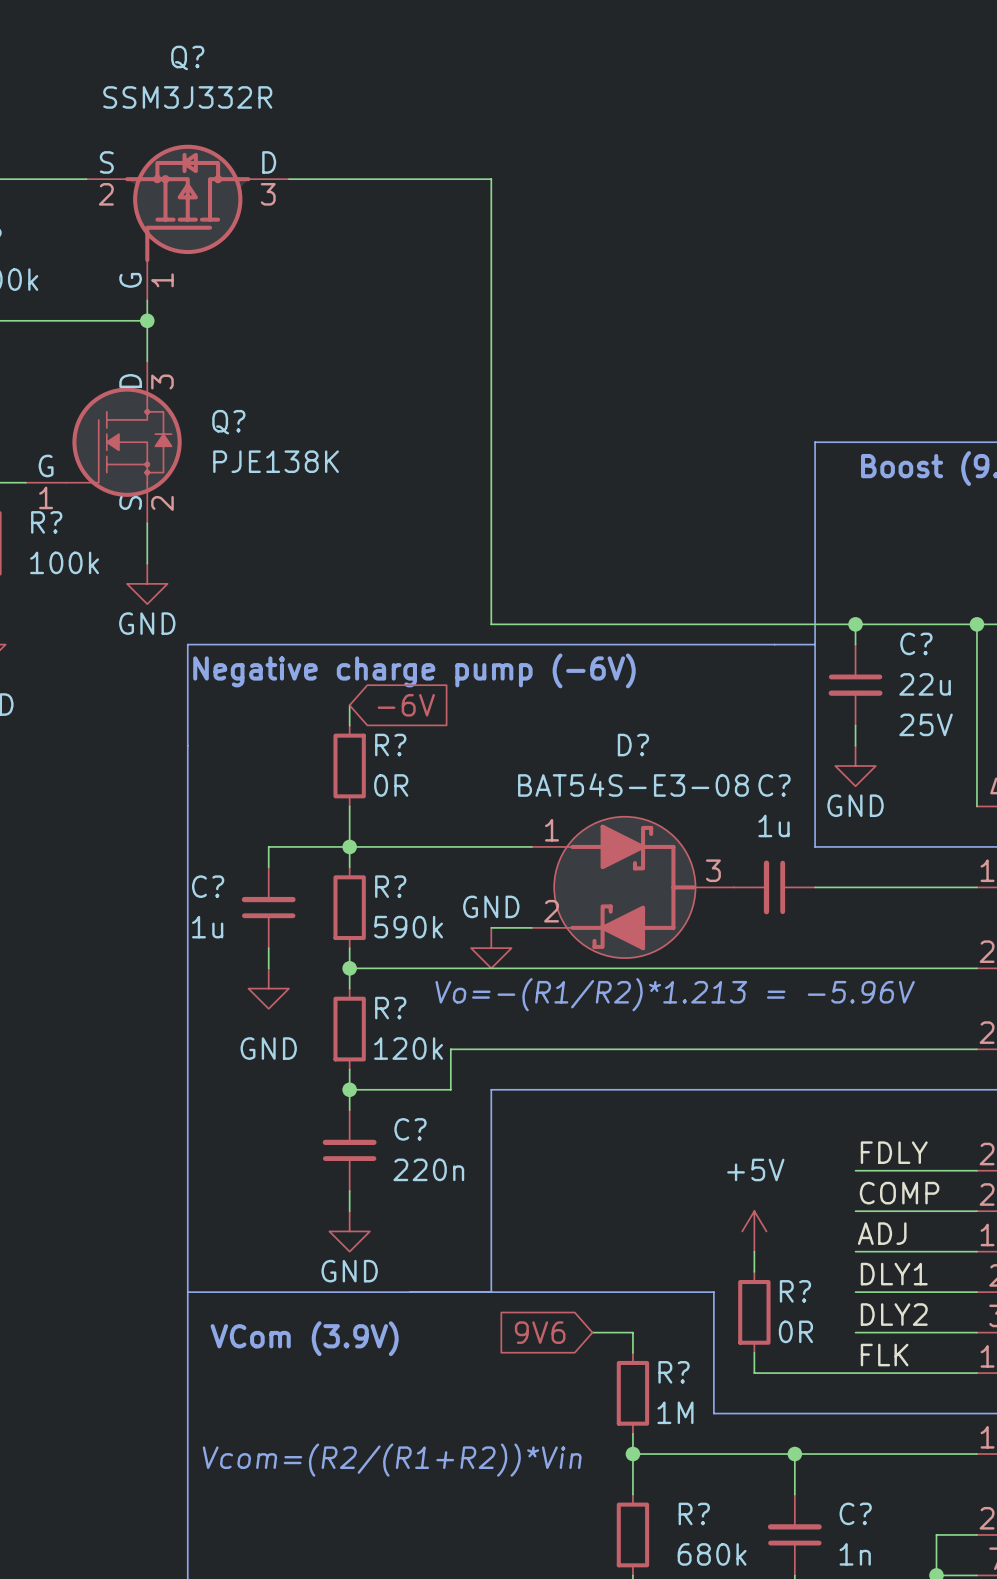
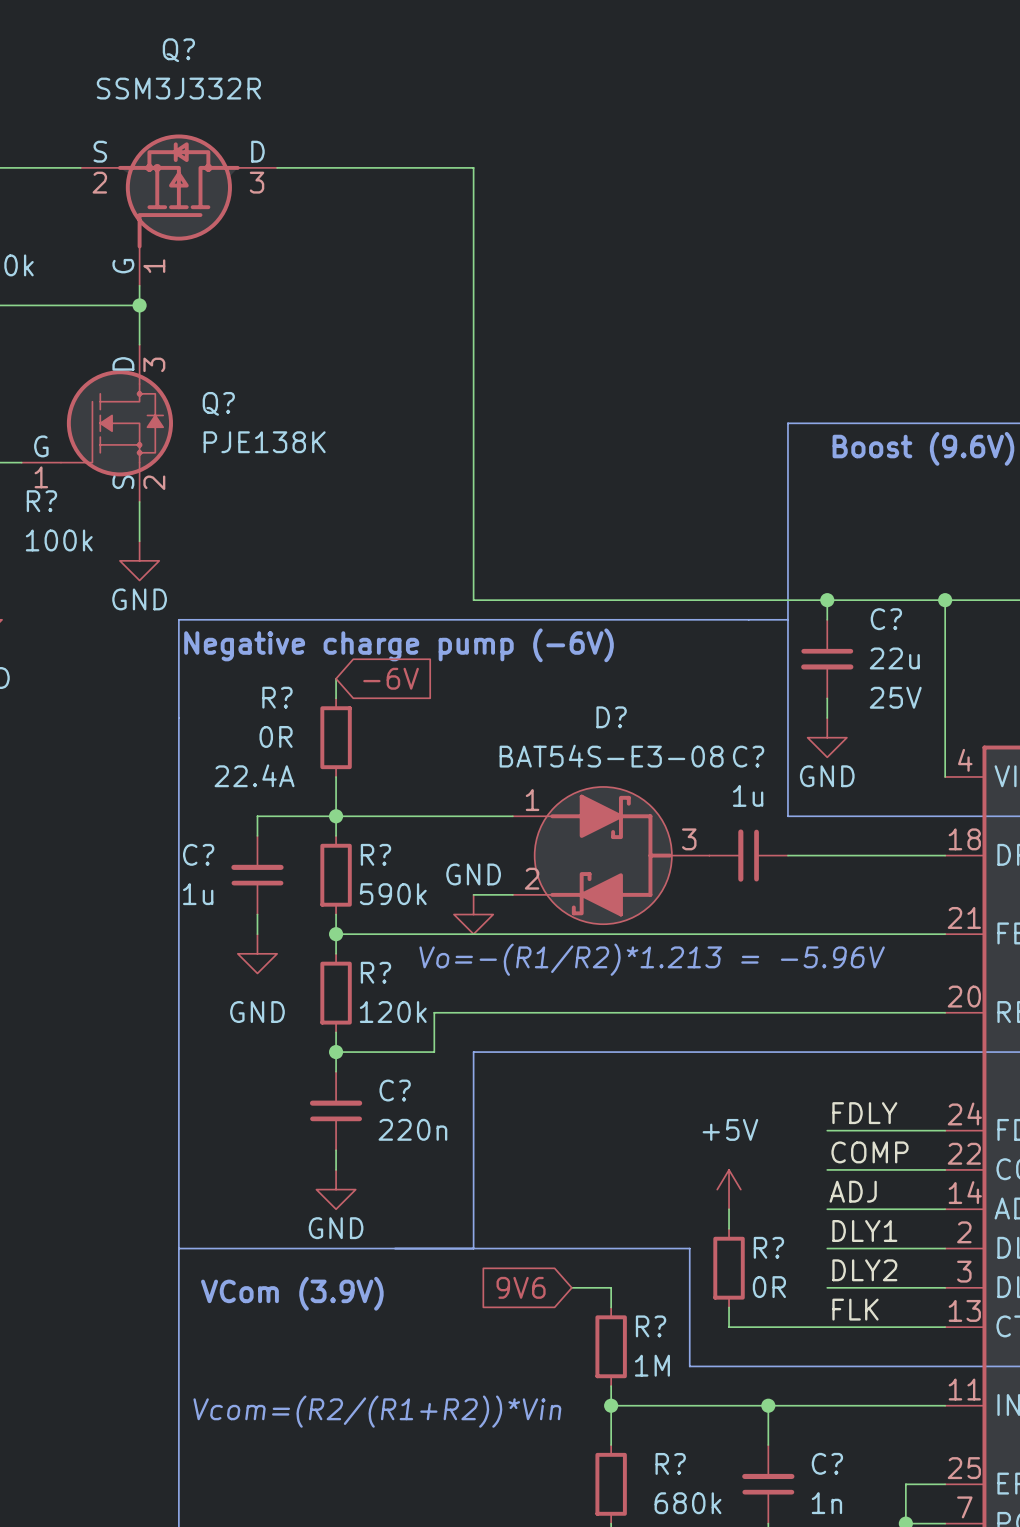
R? name position: R? (390, 745) -> R? (277, 697)
R? text position: 0R (391, 785) -> 0R (276, 736)
R? text: none -> 22.4A (254, 775)

